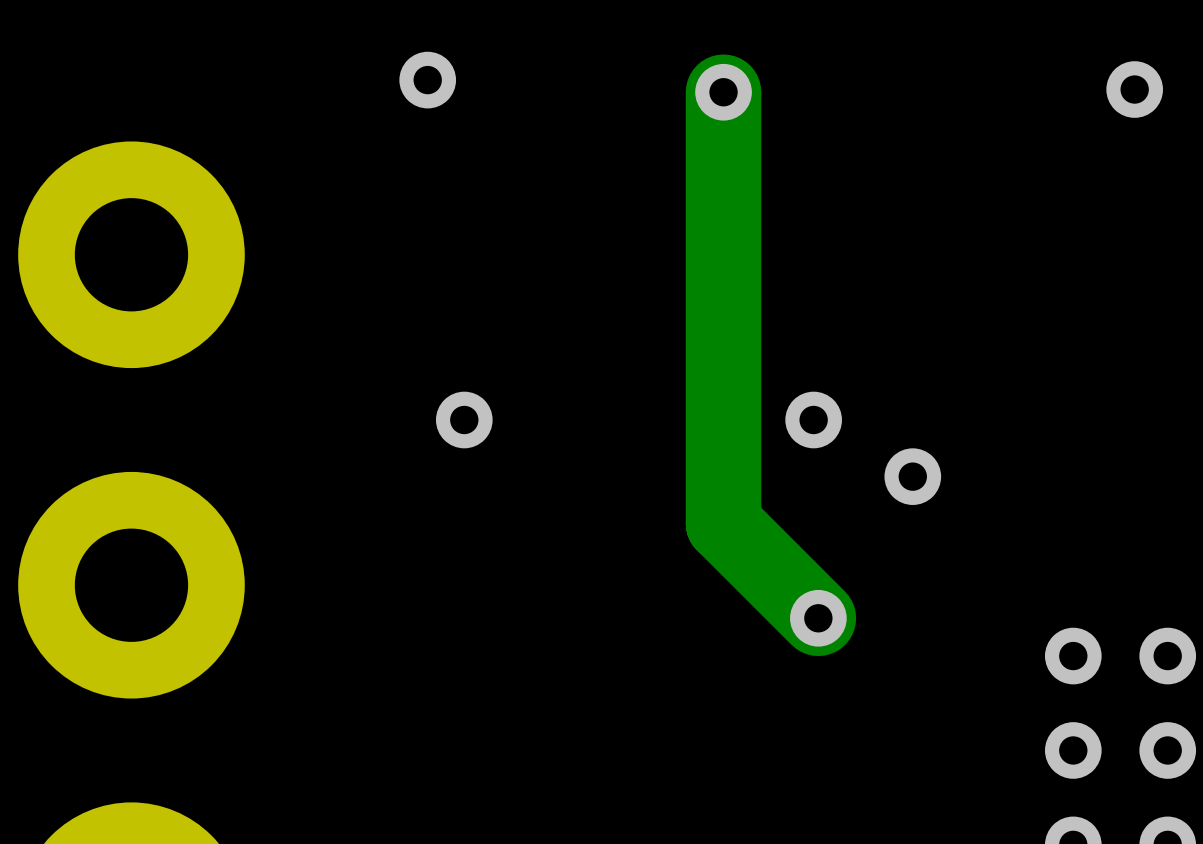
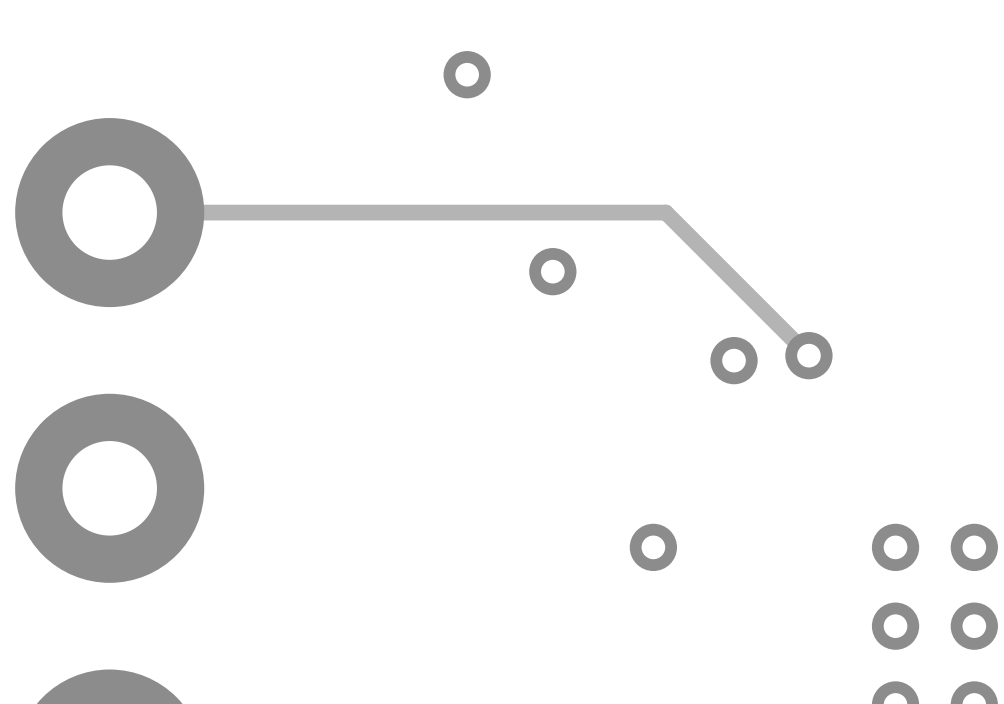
via: (427, 80) -> none
via: none -> (467, 74)
via: (1134, 89) -> none
track: (723, 92) (723, 523) (818, 618) -> none
via: (723, 92) -> none
track: none -> (109, 212) (665, 212) (808, 355)
via: none -> (552, 271)
via: (464, 420) -> none
via: (813, 420) -> none
via: none -> (808, 355)
via position: (912, 476) -> (734, 360)
via position: (818, 618) -> (653, 547)

